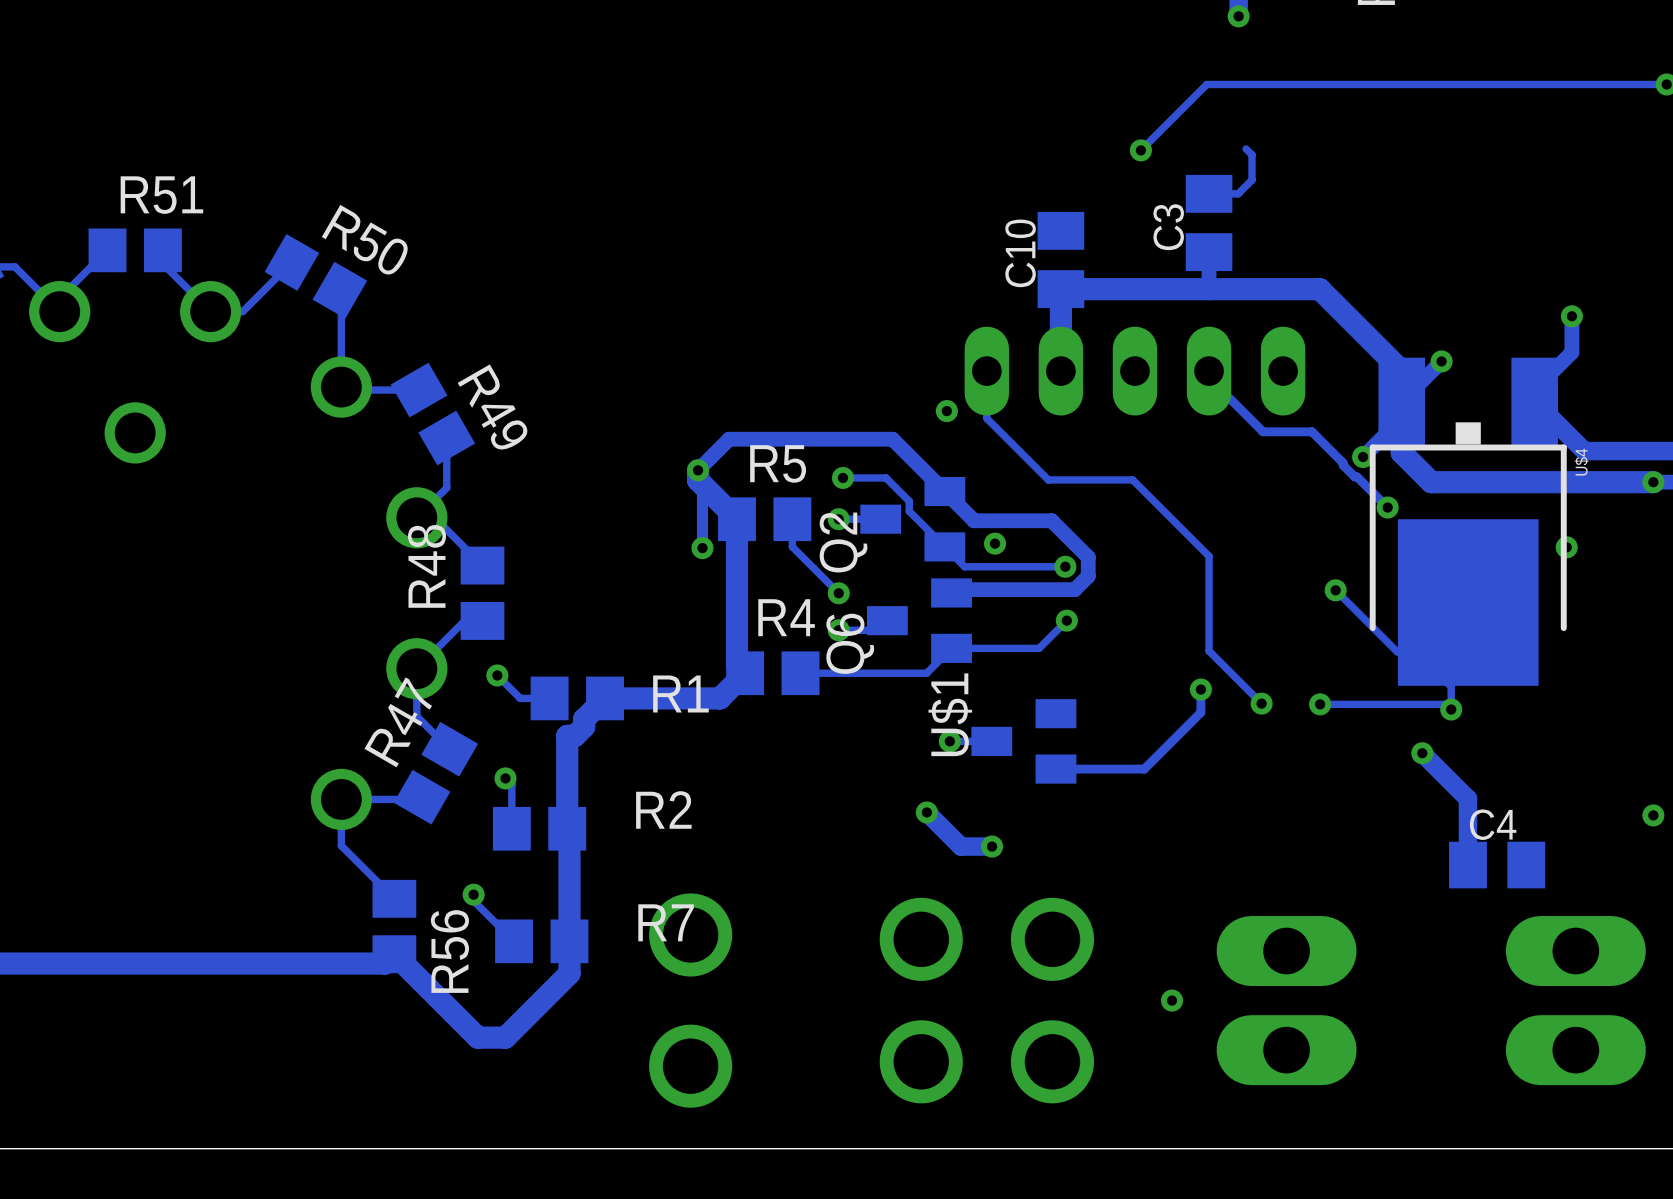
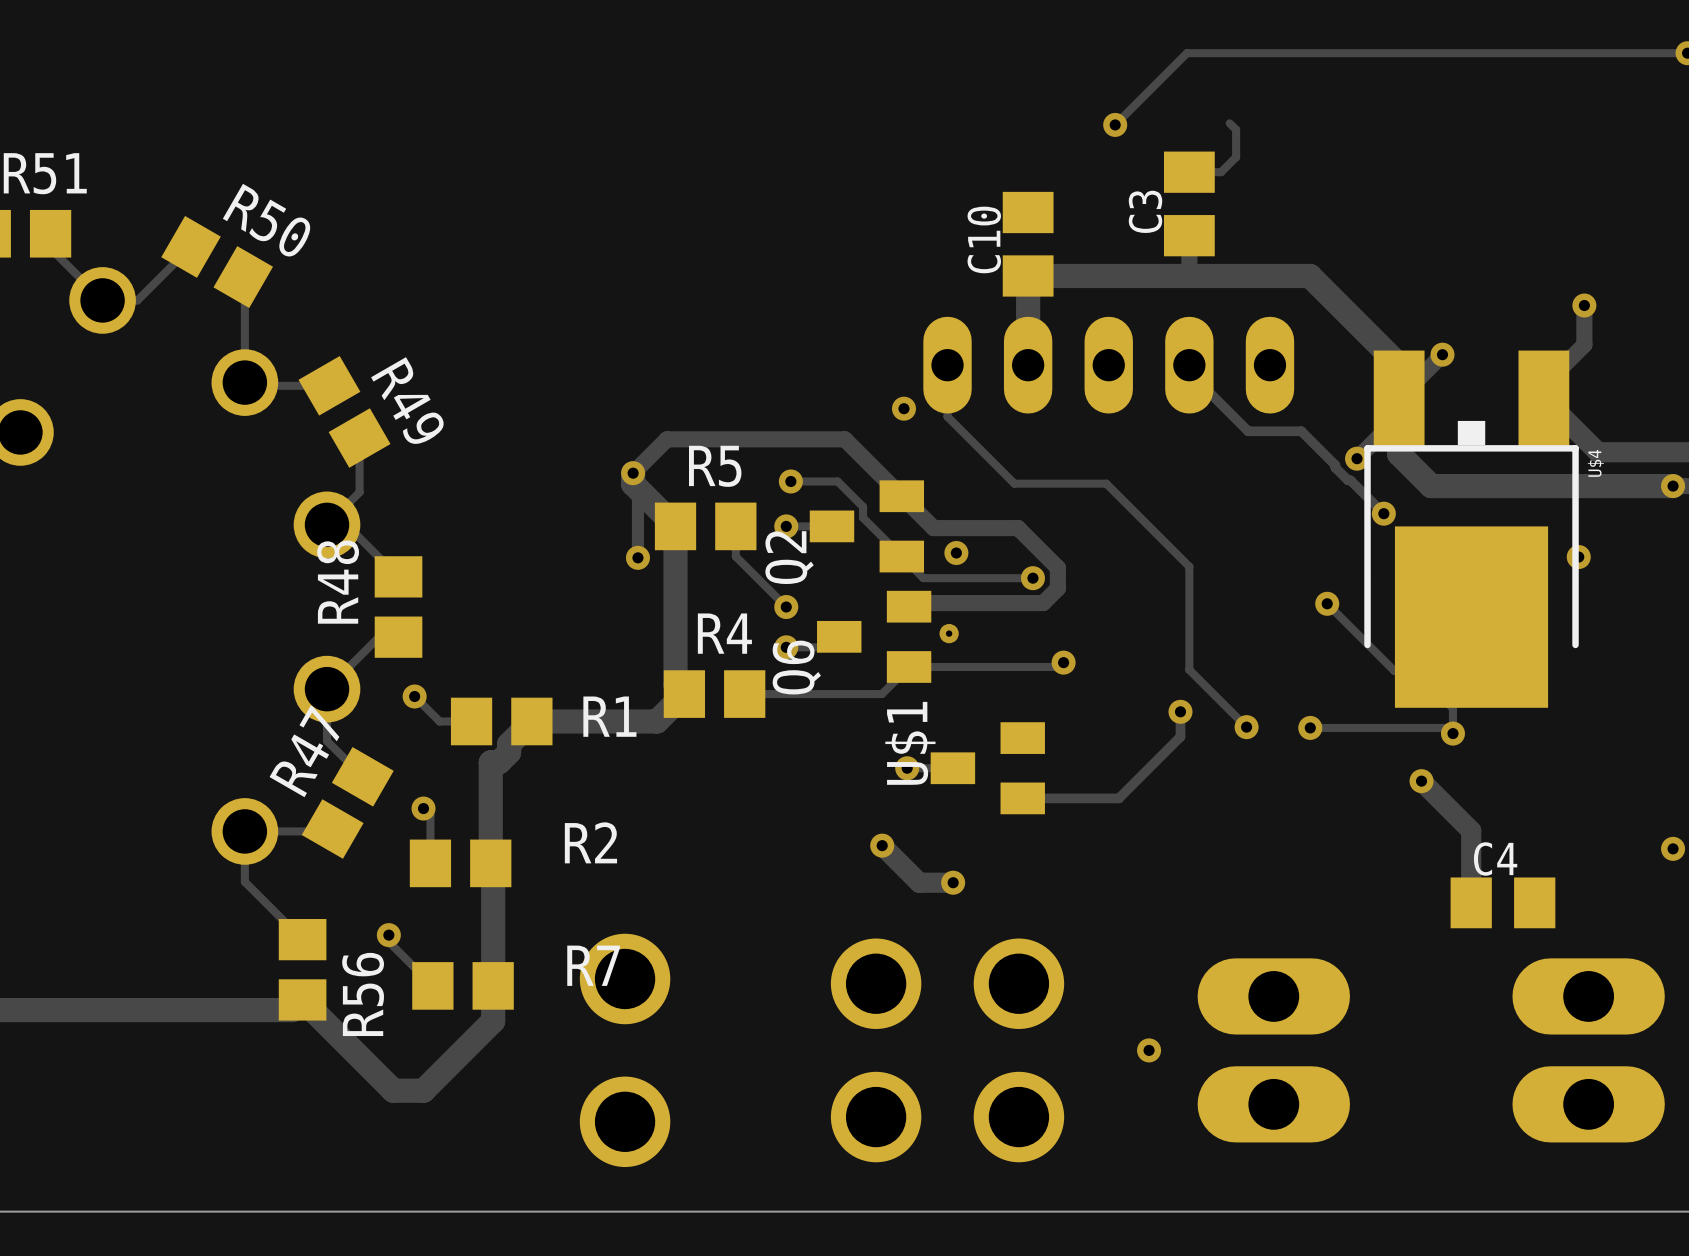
via: none -> (949, 633)
track: (1066, 620) (1039, 648) -> (1063, 662) (1059, 666) (1004, 666)
via position: (1066, 620) -> (1063, 662)

